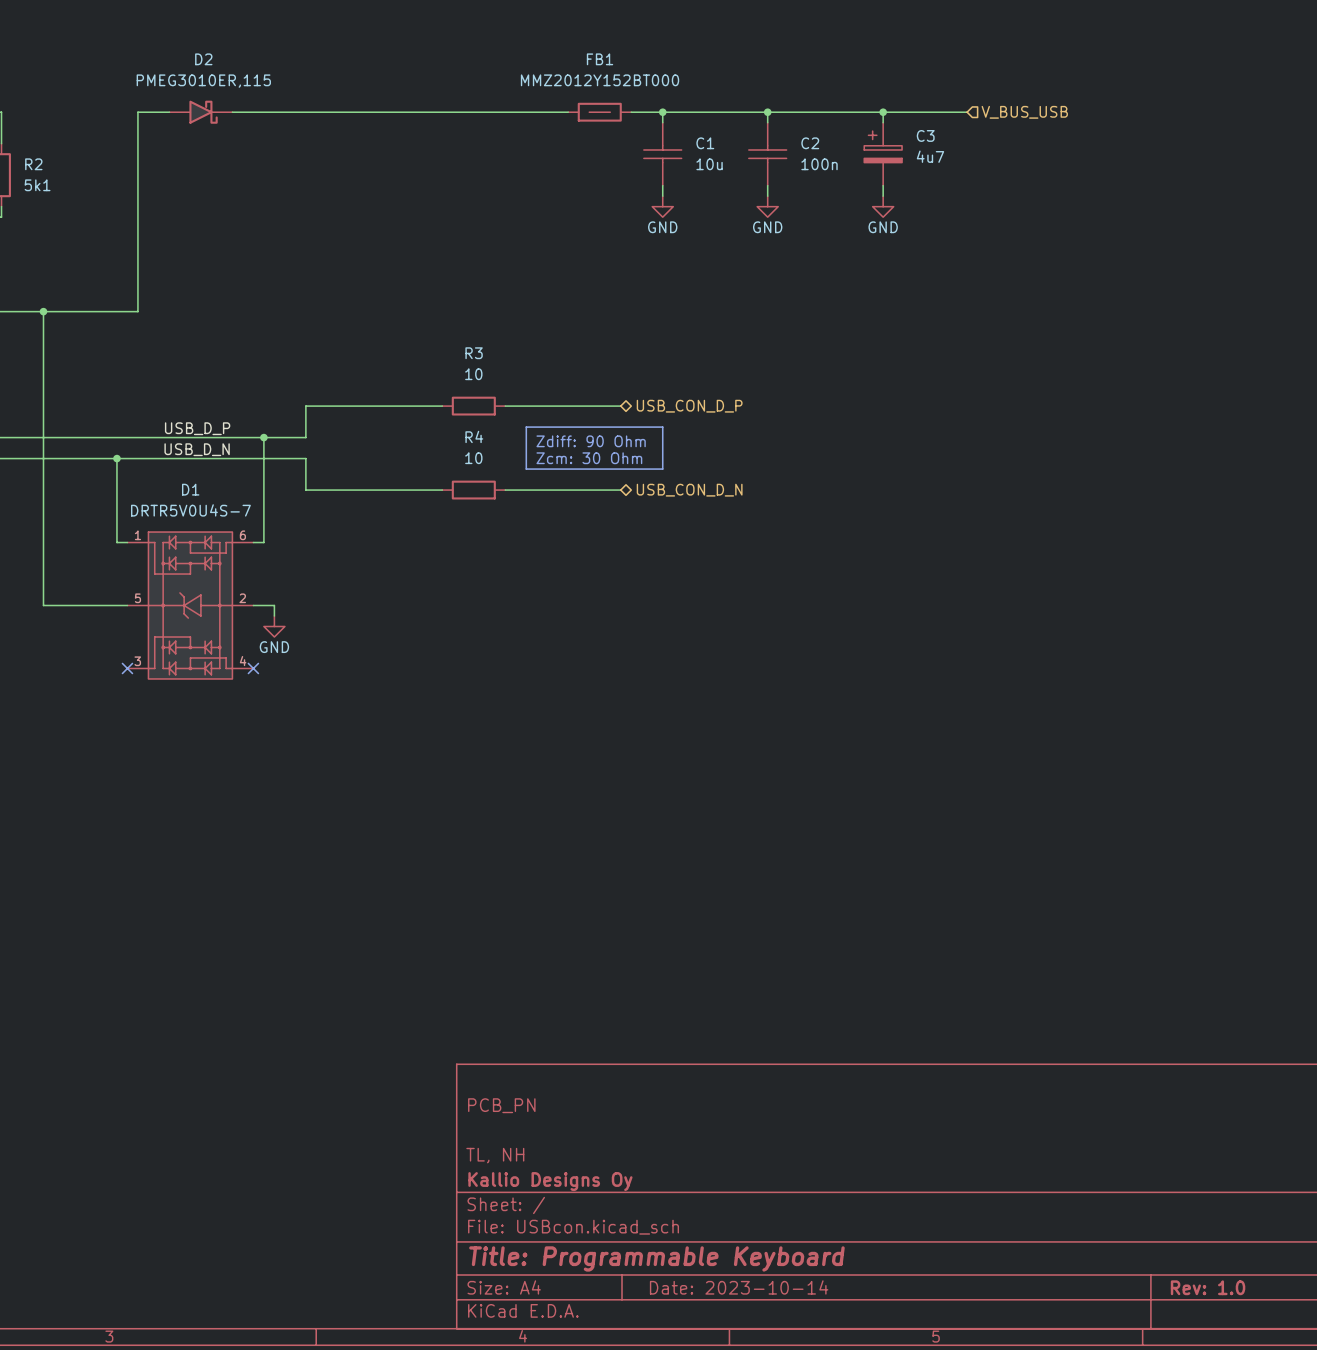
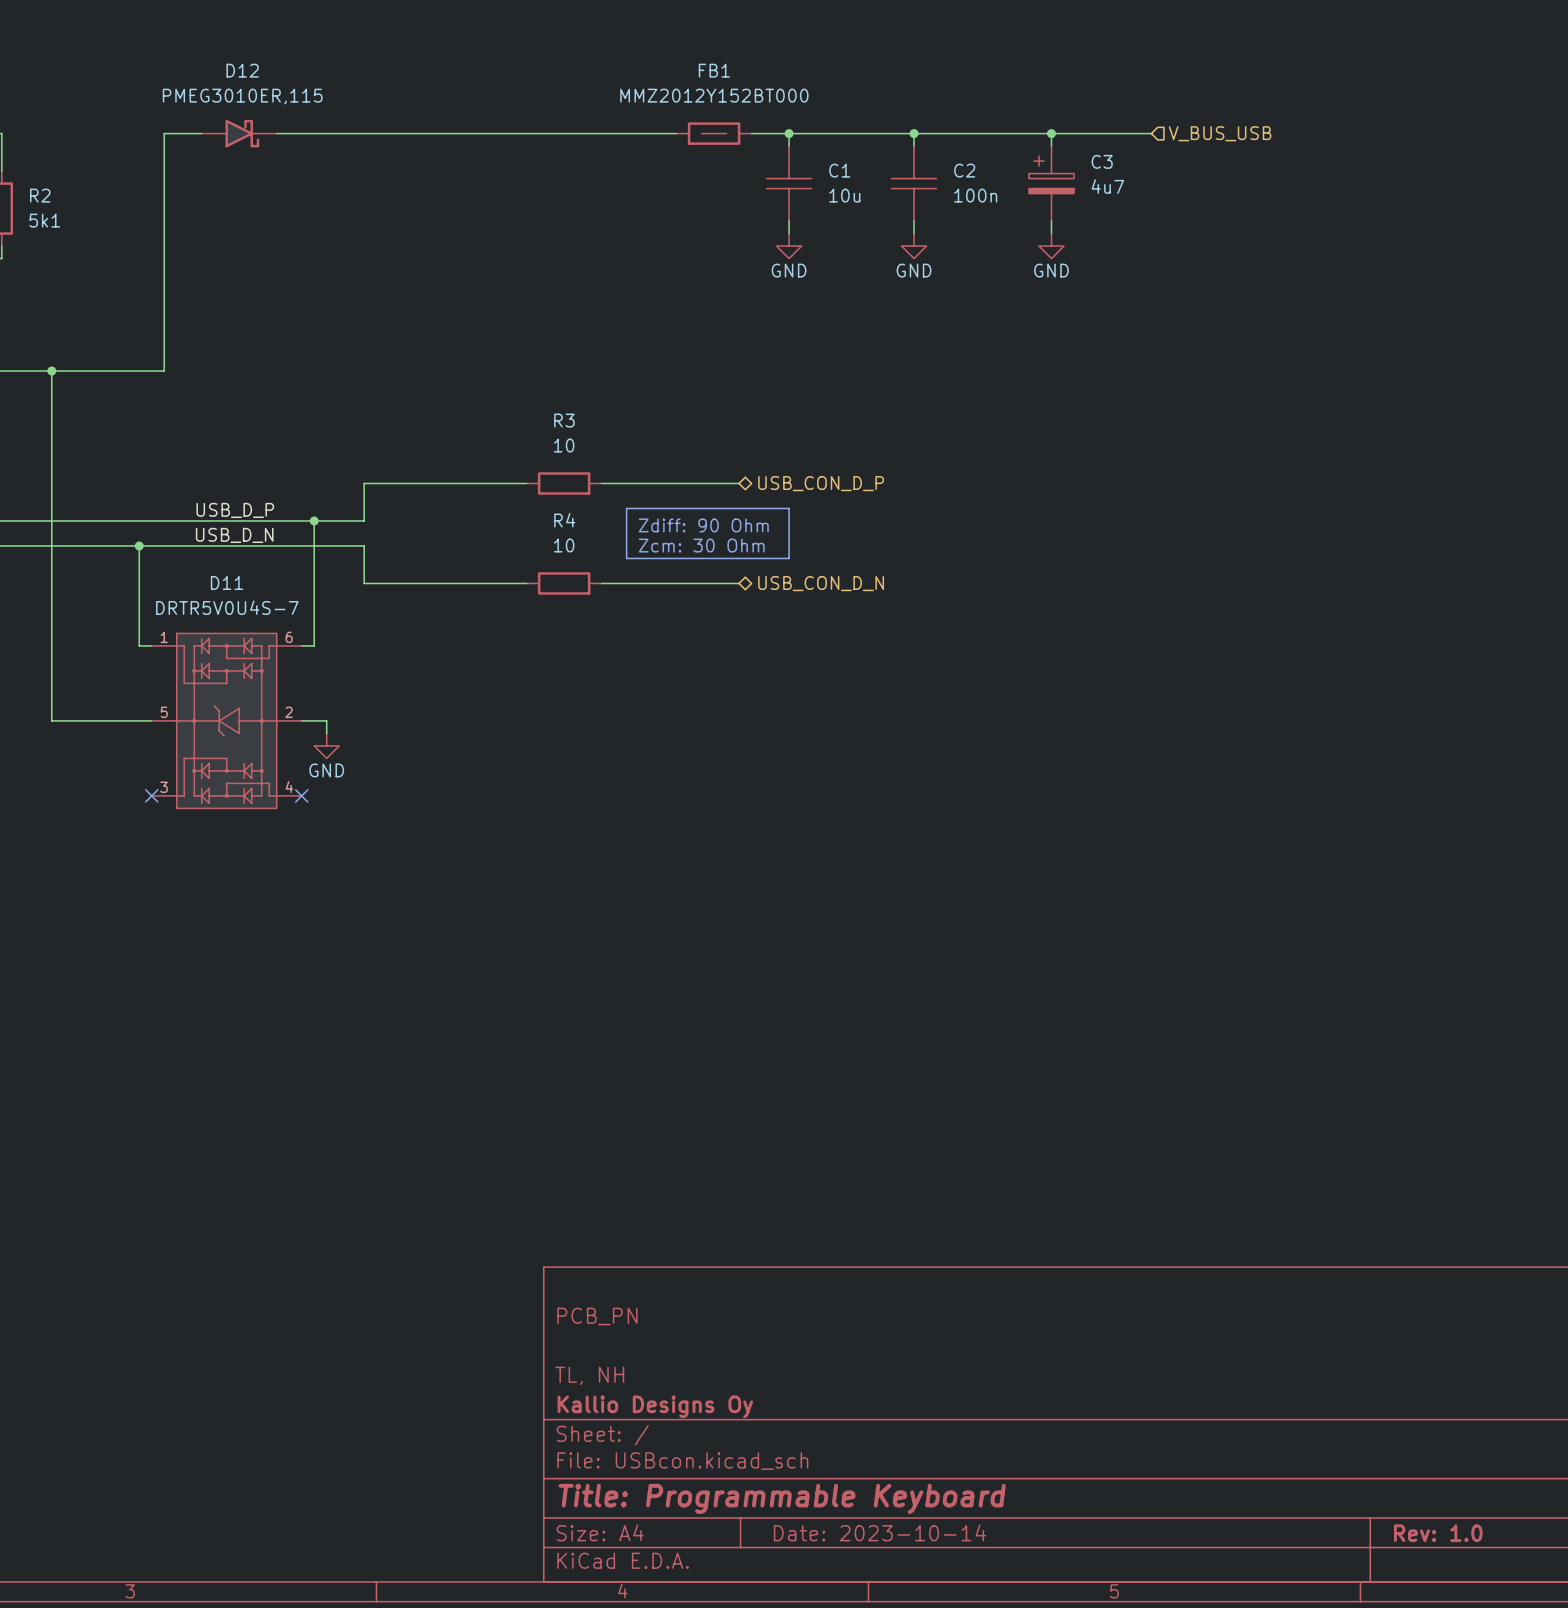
D2 name: D2 (203, 59) -> D12 (242, 70)
D1 name: D1 (190, 489) -> D11 (227, 582)

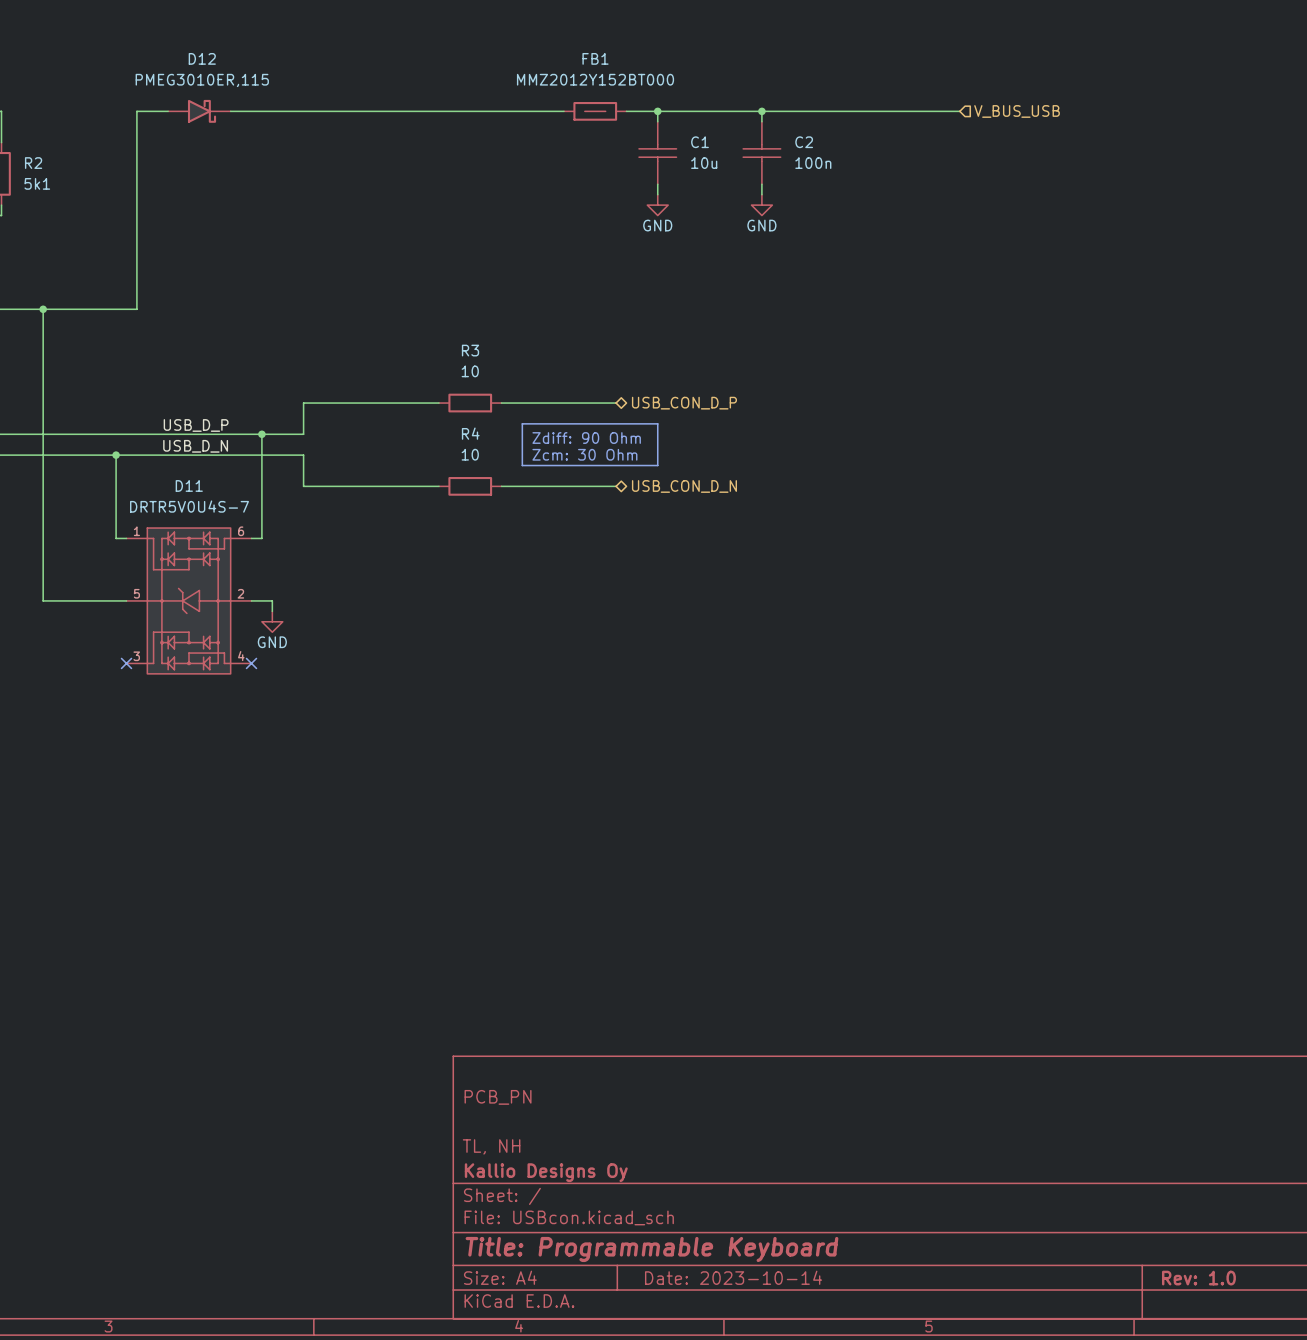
wire: (1051, 133) (1051, 146) -> none
junction: (1051, 133) -> none
C3: 4u7 (1051, 183) -> none
wire: (1051, 221) (1051, 233) -> none
power symbol: GND (1051, 246) -> none

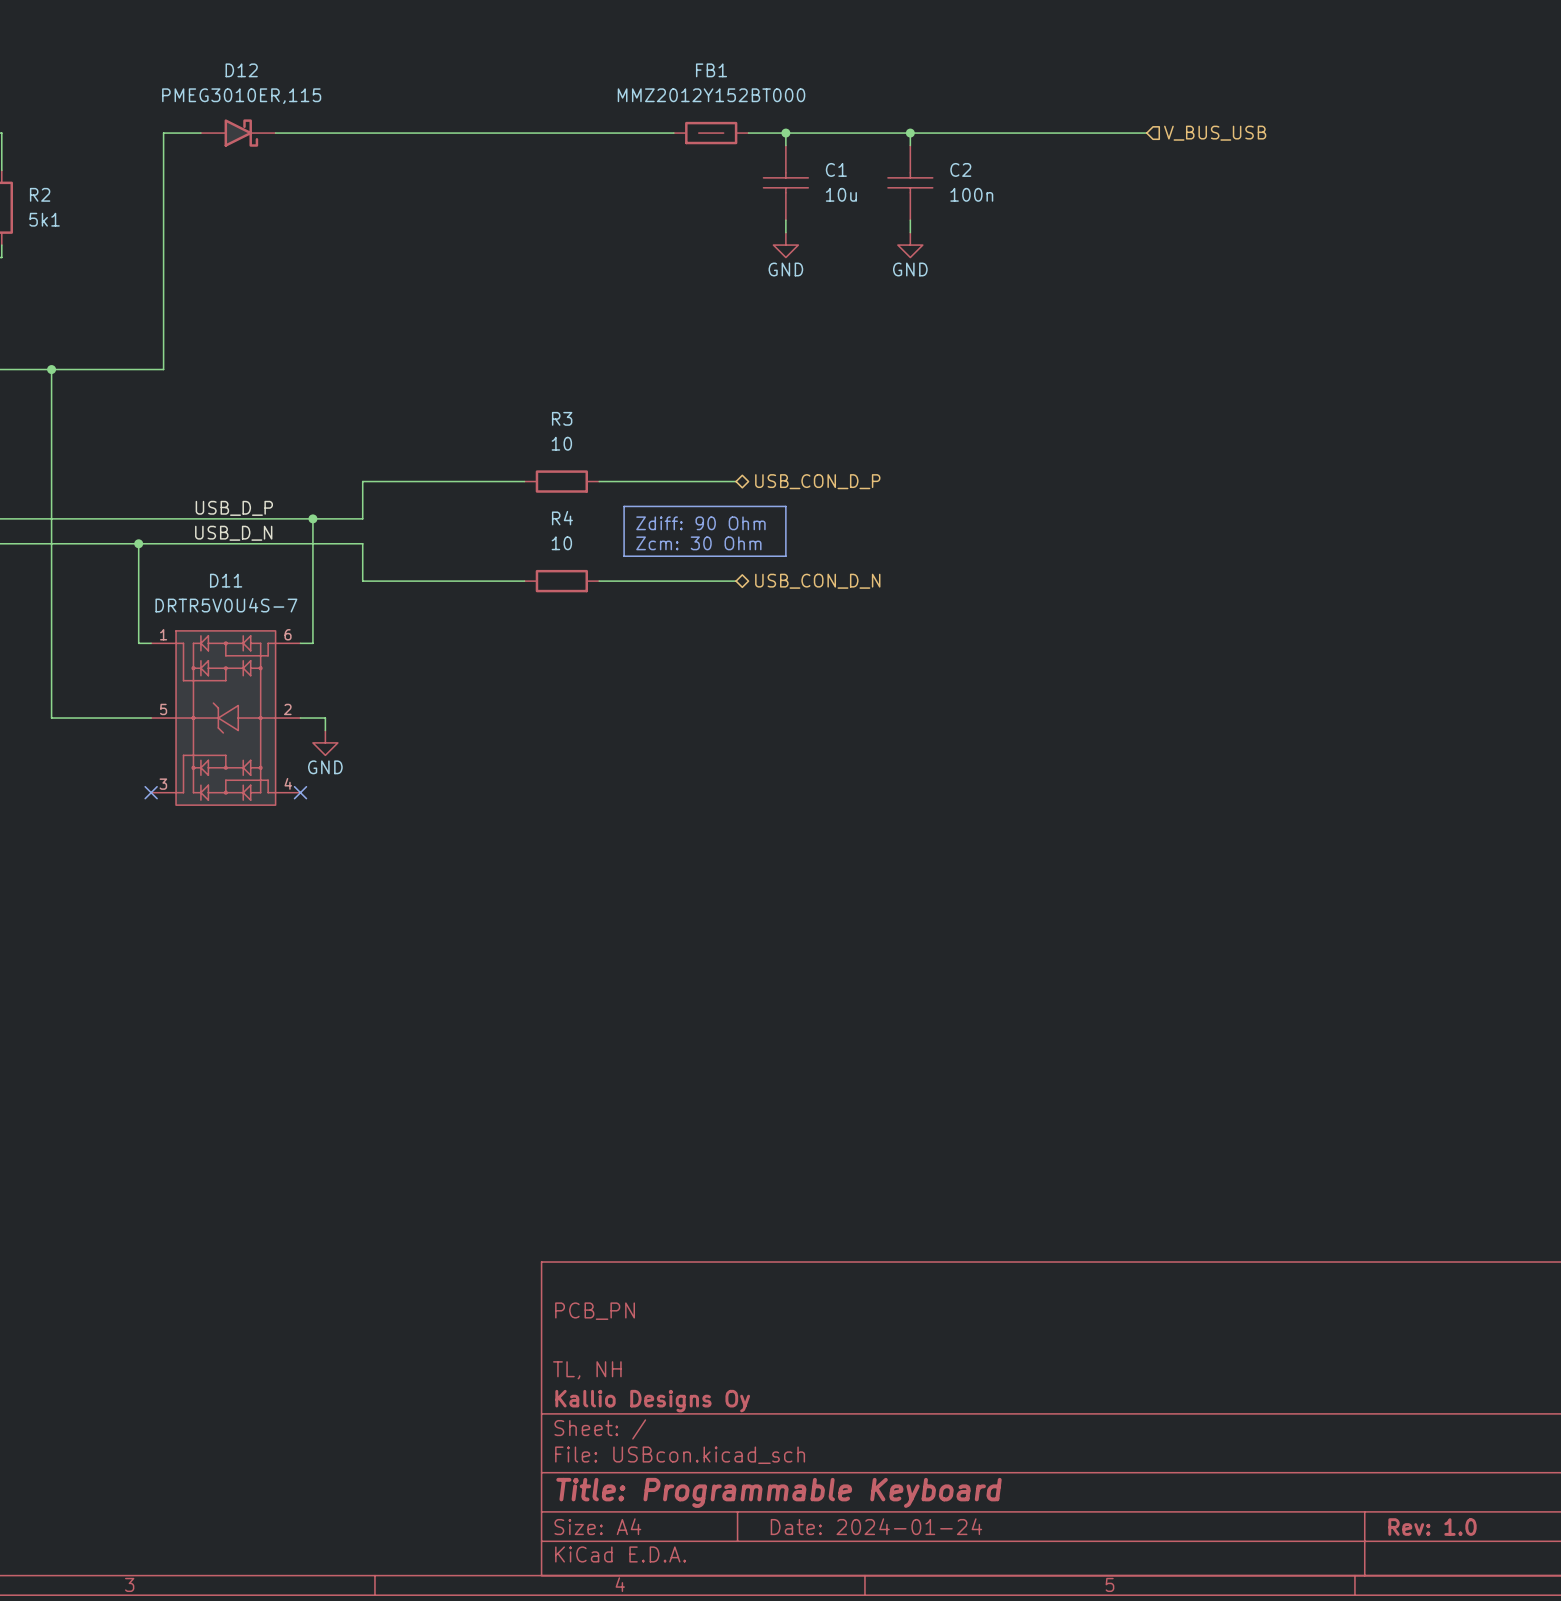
title block: Date: 2023-10-14 (733, 1277) -> Date: 2024-01-24 (876, 1526)

